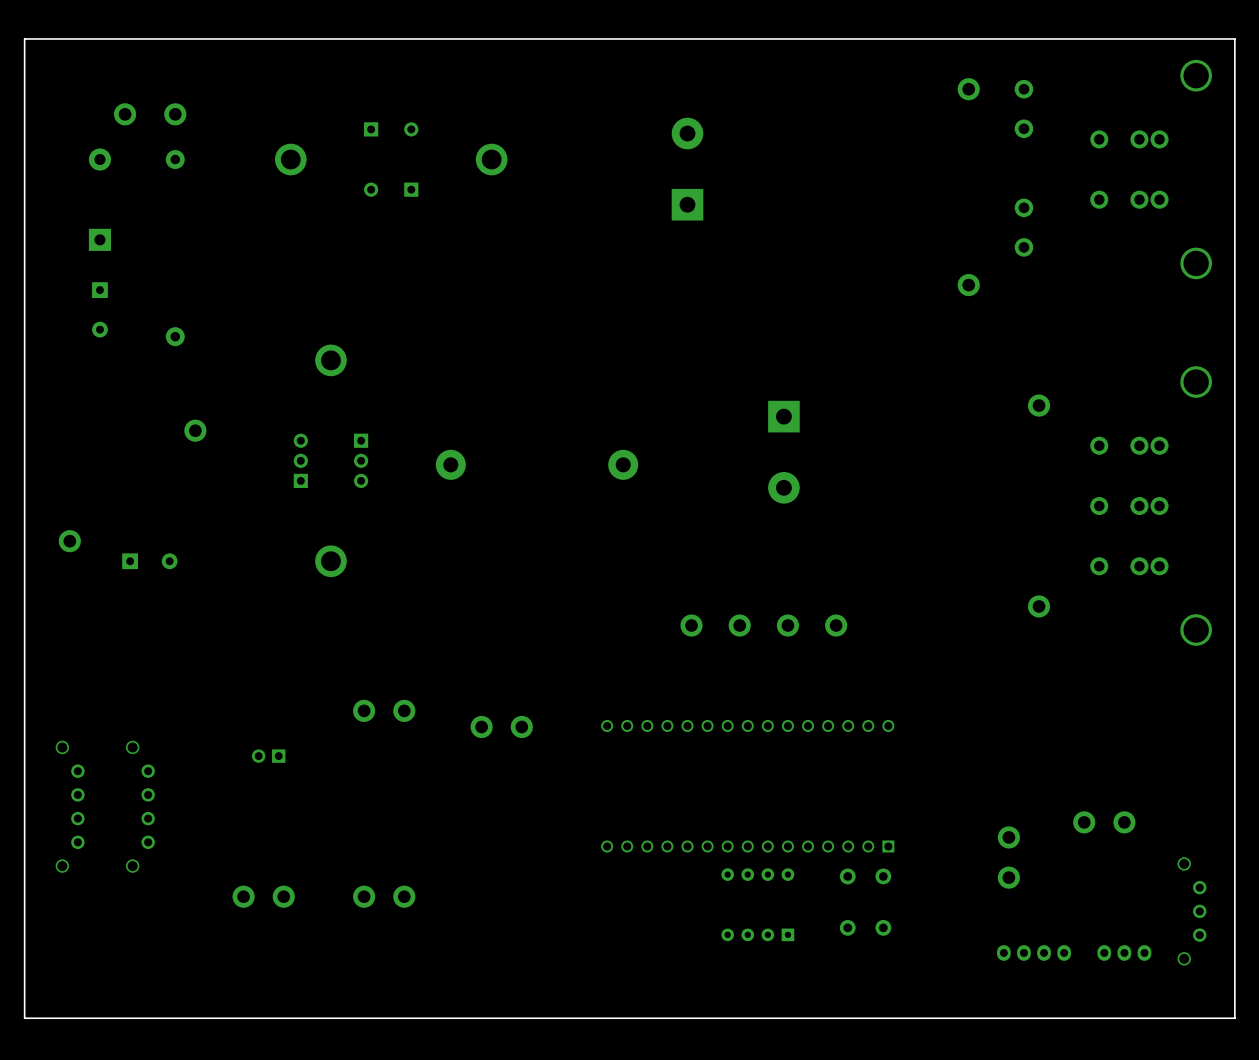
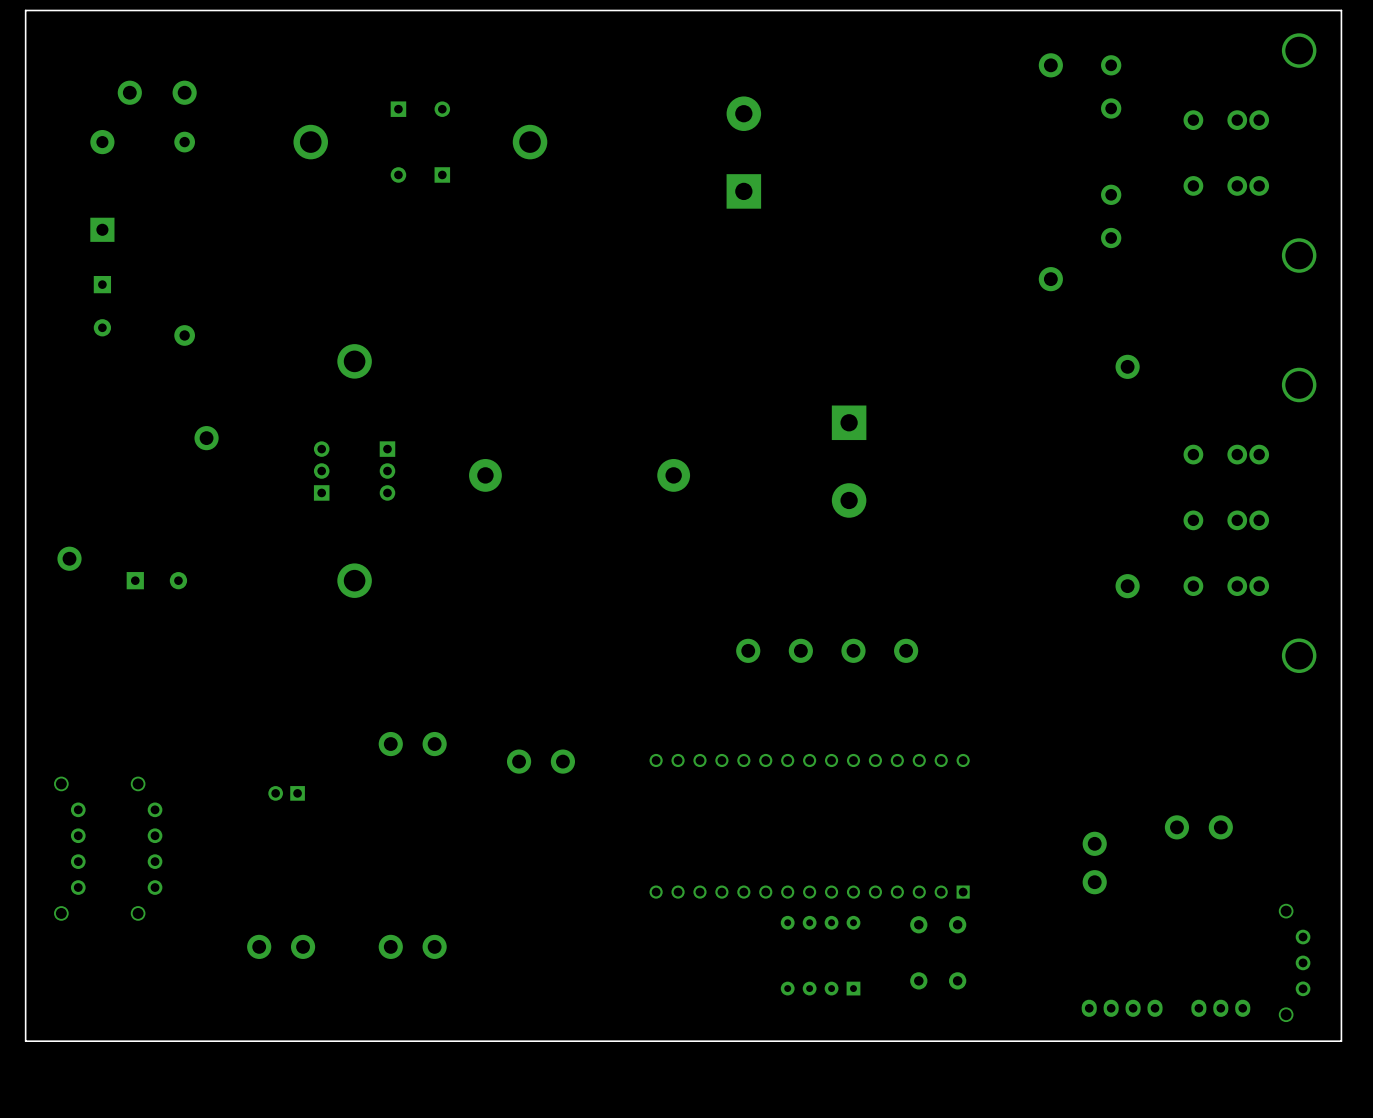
board edge: (29, 39) (24, 39) (24, 1018) (1234, 1018) (1234, 983) -> (25, 10) (25, 1041) (1341, 1041)
part position: (1039, 405) -> (1127, 366)
part position: (1039, 606) -> (1127, 586)
part: none -> (1176, 827)
part: none -> (1220, 827)
part: none -> (1094, 843)
part: (1084, 822) -> none
part: (1124, 822) -> none
part: (1008, 877) -> none

